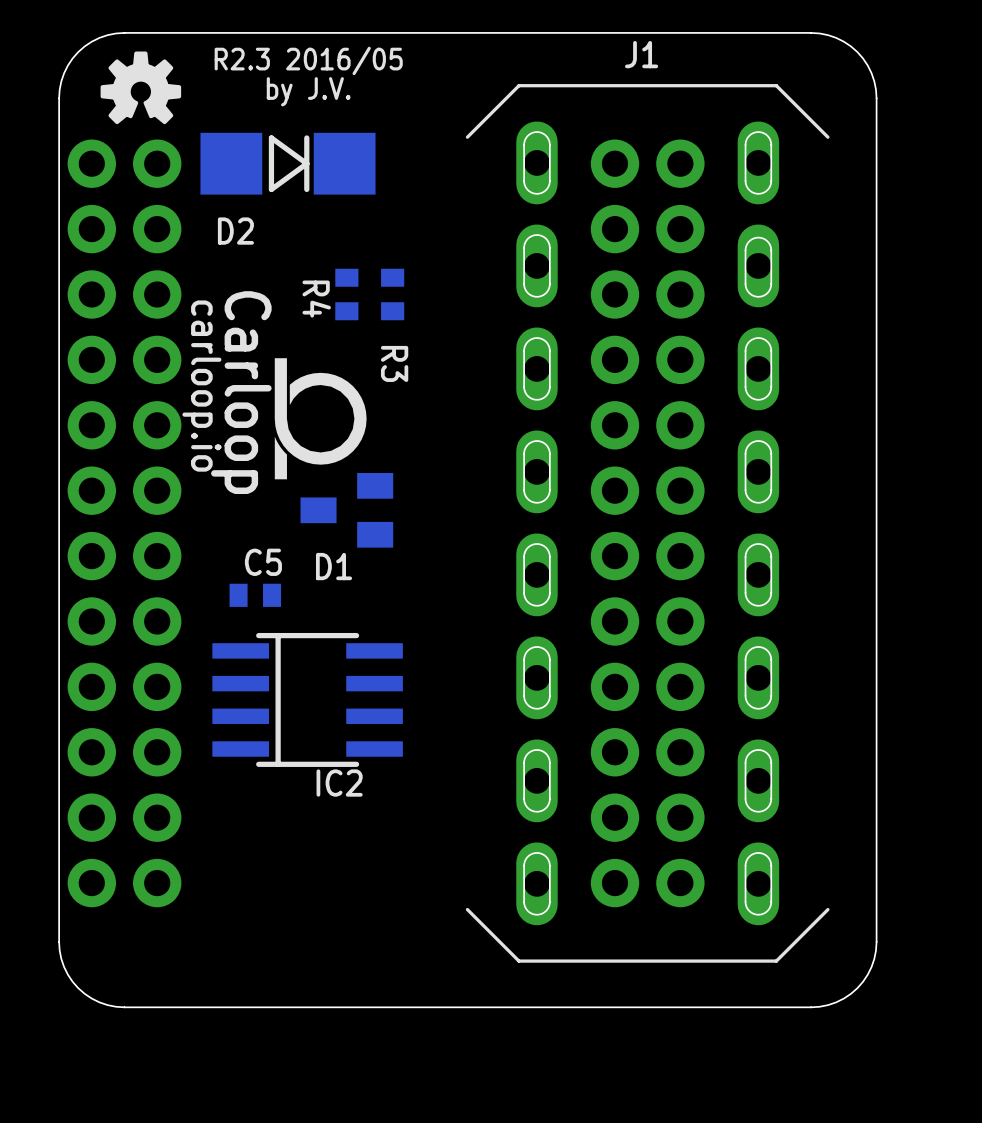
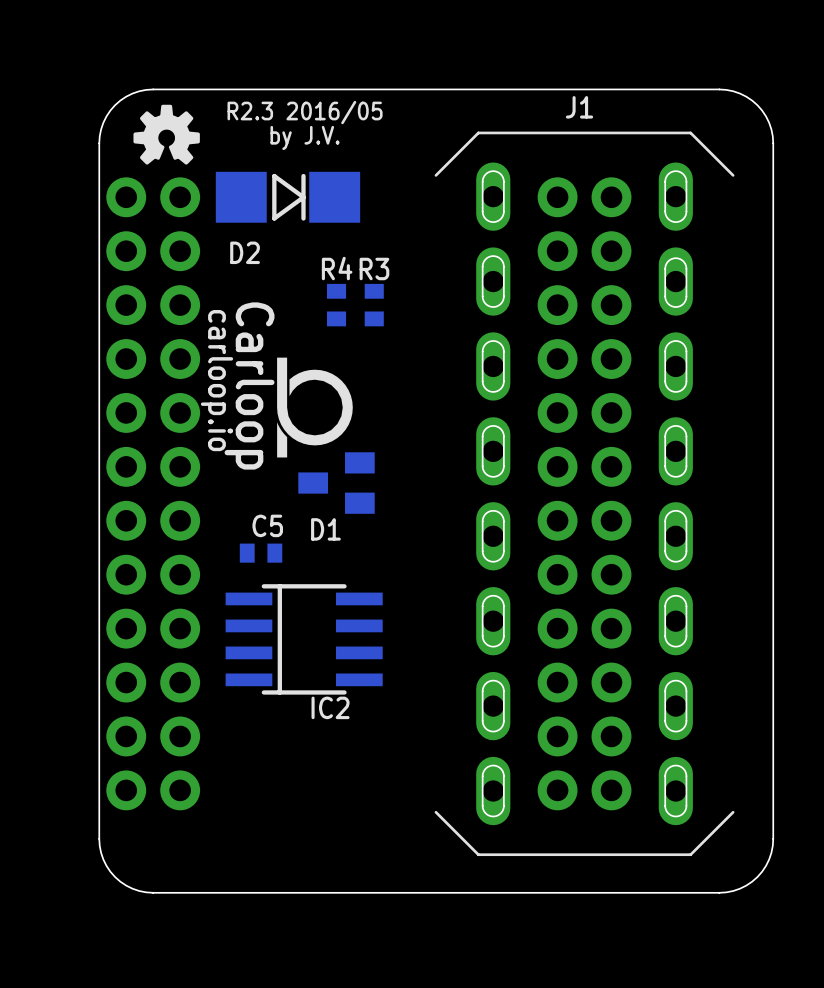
R4 name rotation: 0° (316, 299) -> 90° counterclockwise (337, 268)
R4 name position: R4 (316, 299) -> R4 (337, 268)
R3 name rotation: 0° (394, 363) -> 90° counterclockwise (374, 268)
R3 name position: R3 (394, 363) -> R3 (374, 268)

